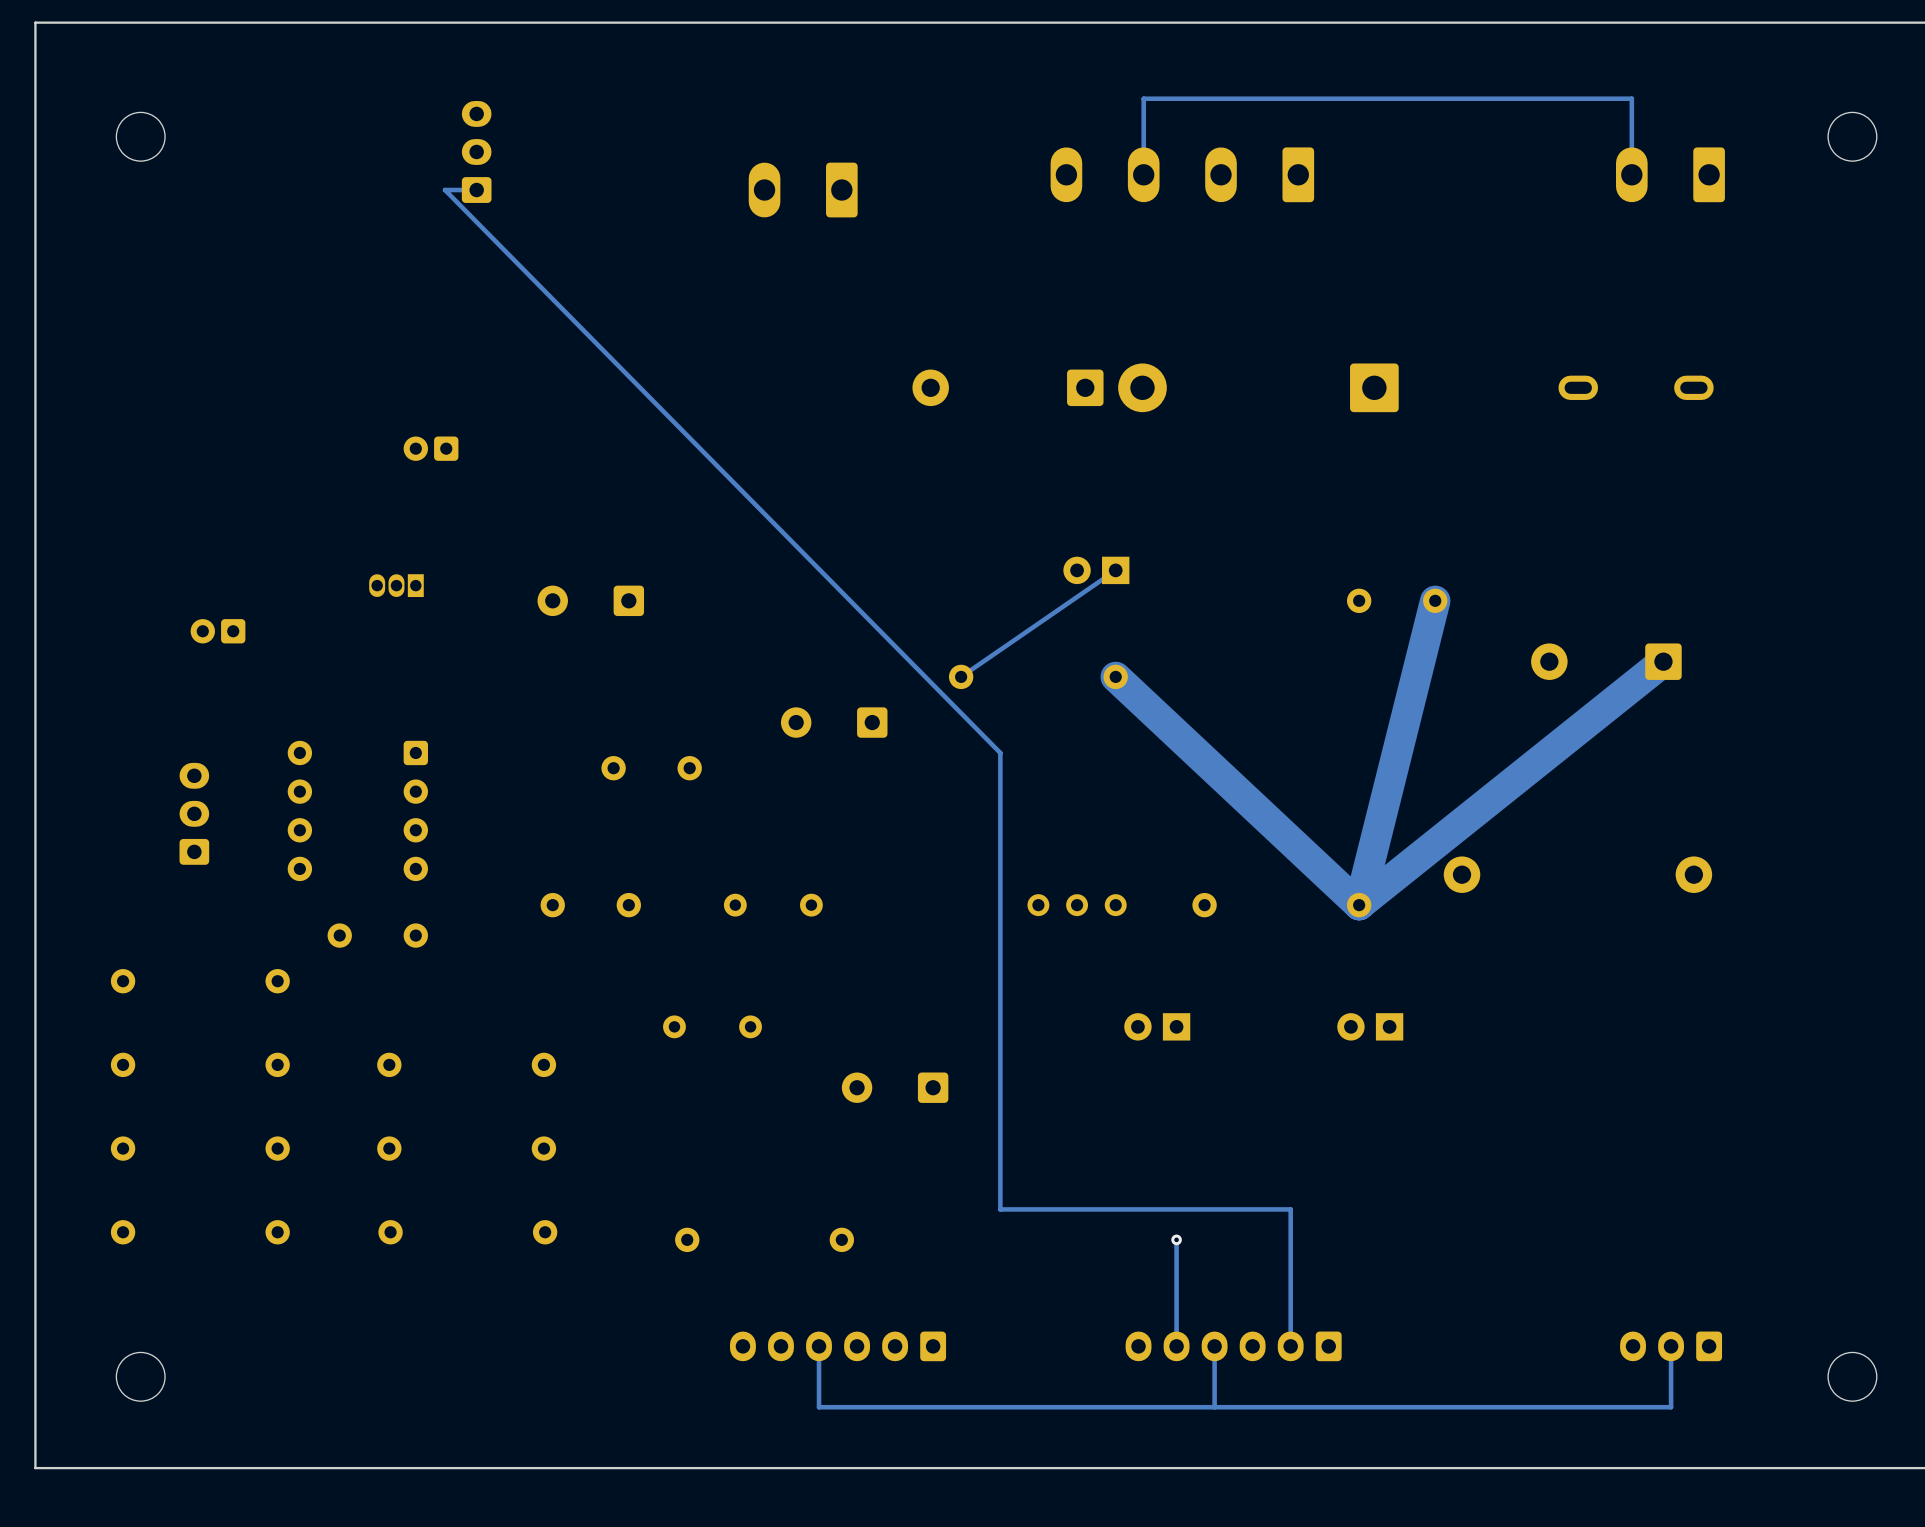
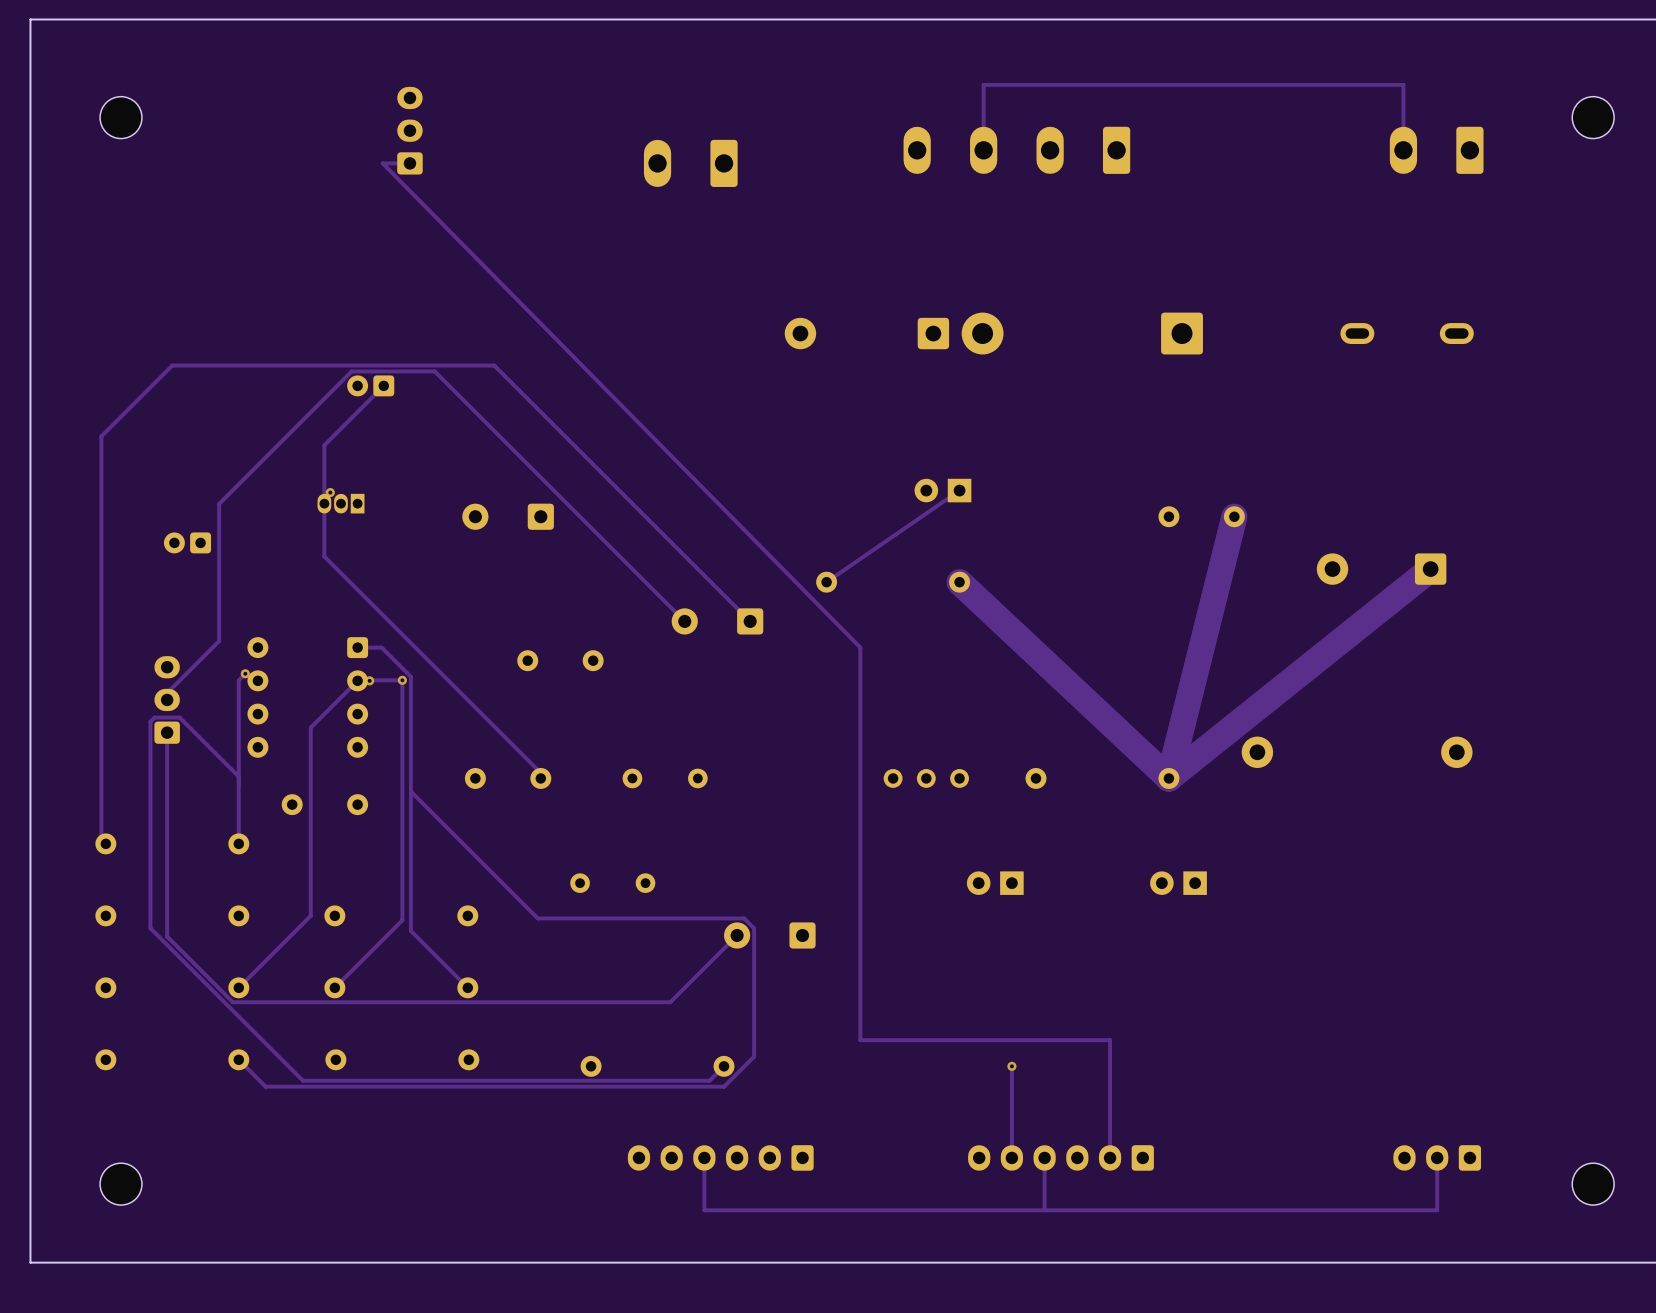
track: none -> (383, 385) (324, 445) (324, 556) (546, 778) (540, 778)
via: none -> (330, 492)
track: none -> (684, 621) (434, 371) (351, 371) (219, 503) (219, 641) (166, 693) (167, 699)
track: none -> (750, 621) (494, 365) (172, 365) (101, 436) (101, 837) (105, 843)
track: none -> (357, 647) (381, 647) (410, 676) (410, 930) (467, 987)
track: none -> (245, 673) (238, 680) (238, 843)
via: none -> (245, 673)
track: none -> (357, 680) (310, 727) (310, 915) (238, 987)
track: none -> (369, 680) (402, 680) (402, 920) (334, 987)
via: none -> (369, 680)
via: none -> (402, 680)
track: none -> (167, 732) (167, 936) (232, 1002) (670, 1002) (737, 935)
track: none -> (238, 776) (179, 717) (154, 717) (150, 721) (150, 928) (302, 1080) (709, 1080) (724, 1066)
track: none -> (410, 791) (537, 918) (744, 918) (754, 928) (754, 1056) (724, 1086) (265, 1086) (238, 1059)

